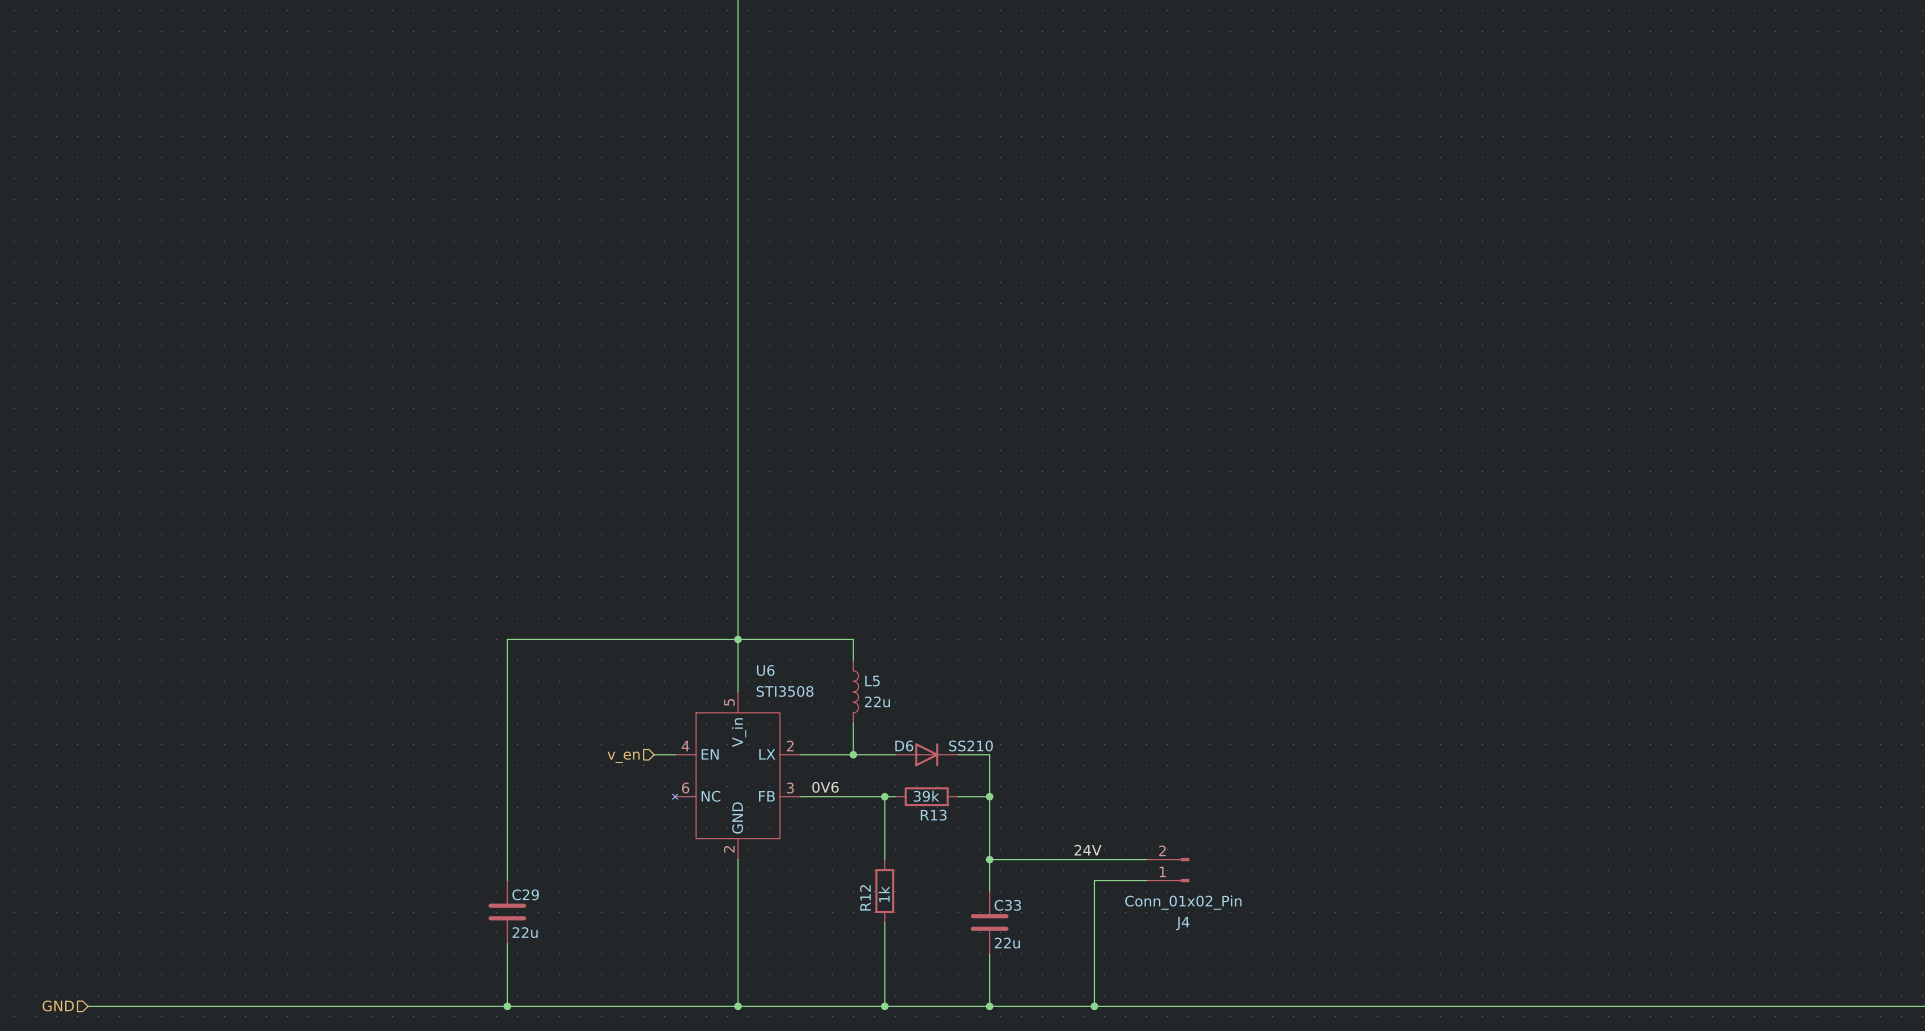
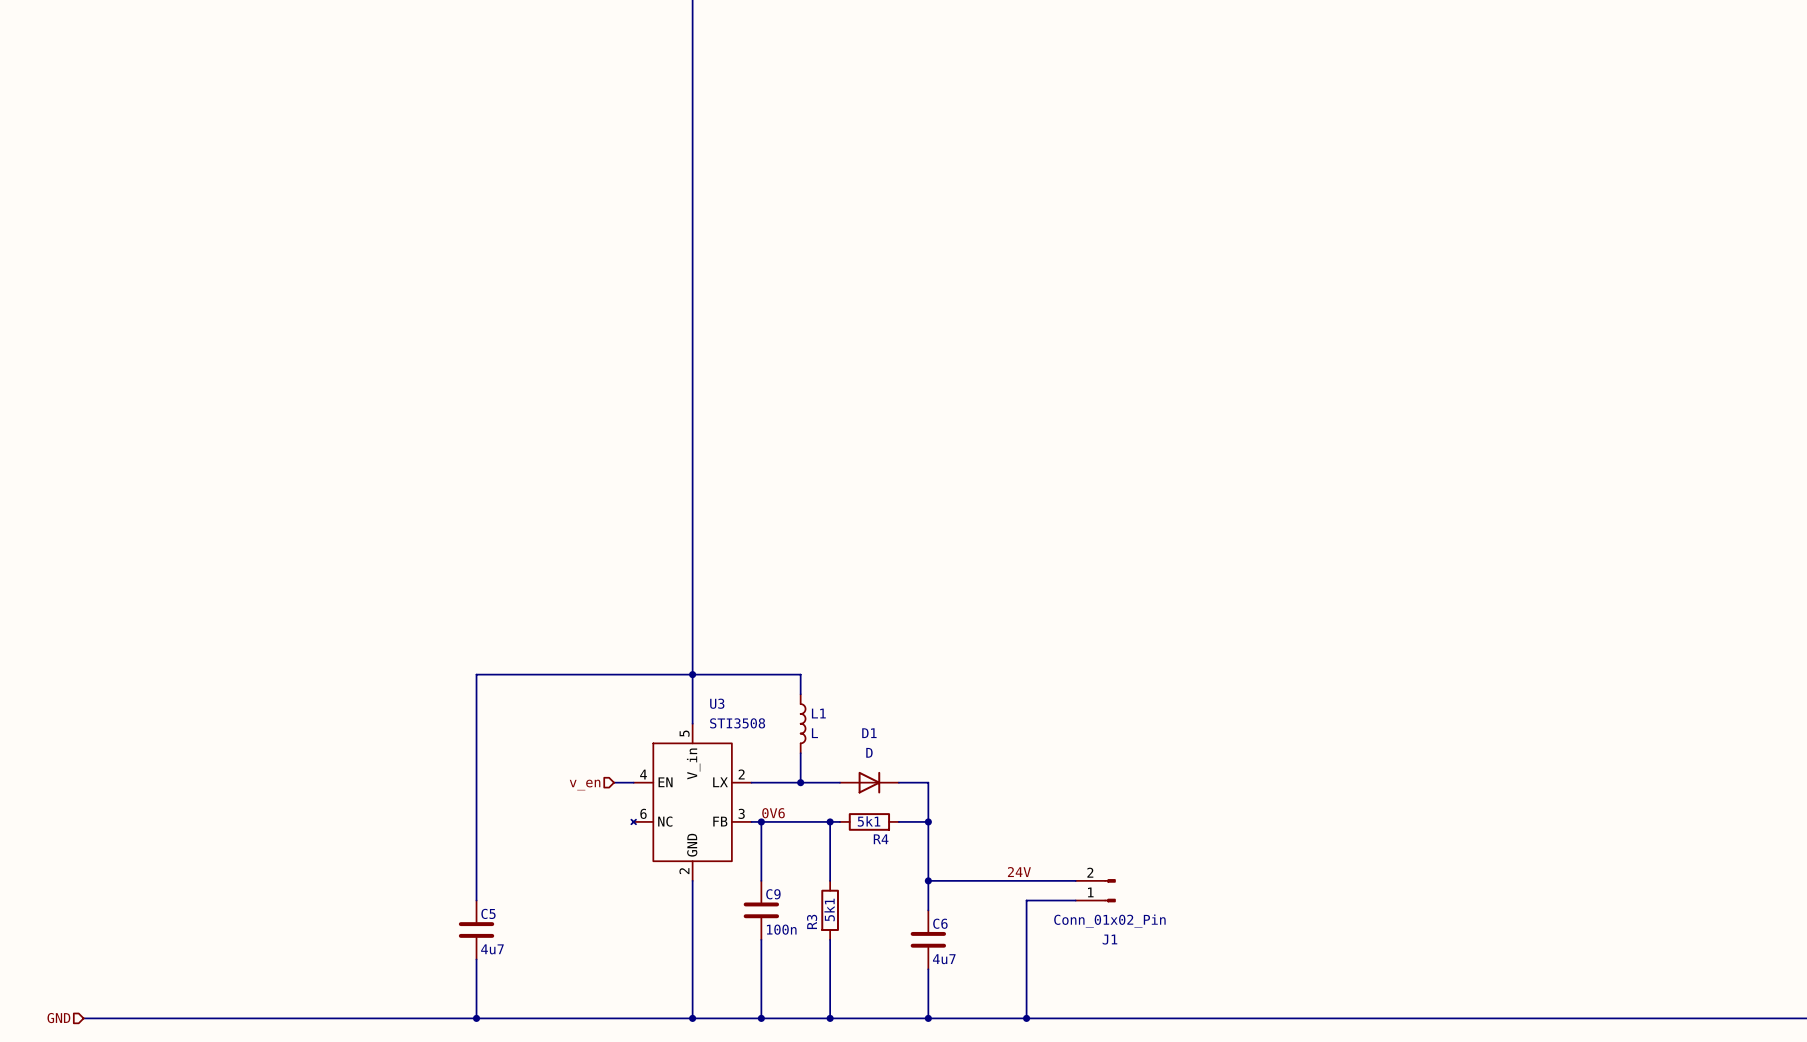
U6 name: U6 (765, 670) -> U3 (717, 703)
L5 name: L5 (872, 681) -> L1 (818, 713)
L5 value: 22u (877, 701) -> L (814, 733)
D6 name: D6 (904, 745) -> D1 (869, 733)
D6 value: SS210 (970, 745) -> D (869, 752)
wire: none -> (761, 821) (761, 880)
junction: none -> (761, 821)
R13 value: 39k (926, 796) -> 5k1 (869, 821)
R13 name: R13 (933, 815) -> R4 (881, 839)
C9: none -> 100n (761, 910)
C29 name: C29 (525, 894) -> C5 (488, 913)
R12 value: 1k (884, 894) -> 5k1 (829, 909)
R12 name: R12 (865, 897) -> R3 (812, 921)
C33 name: C33 (1007, 905) -> C6 (940, 923)
wire: none -> (761, 939) (761, 1018)
J4 name: J4 (1182, 923) -> J1 (1109, 939)
C29 value: 22u (525, 932) -> 4u7 (492, 949)
C33 value: 22u (1007, 943) -> 4u7 (944, 959)
junction: none -> (761, 1018)

